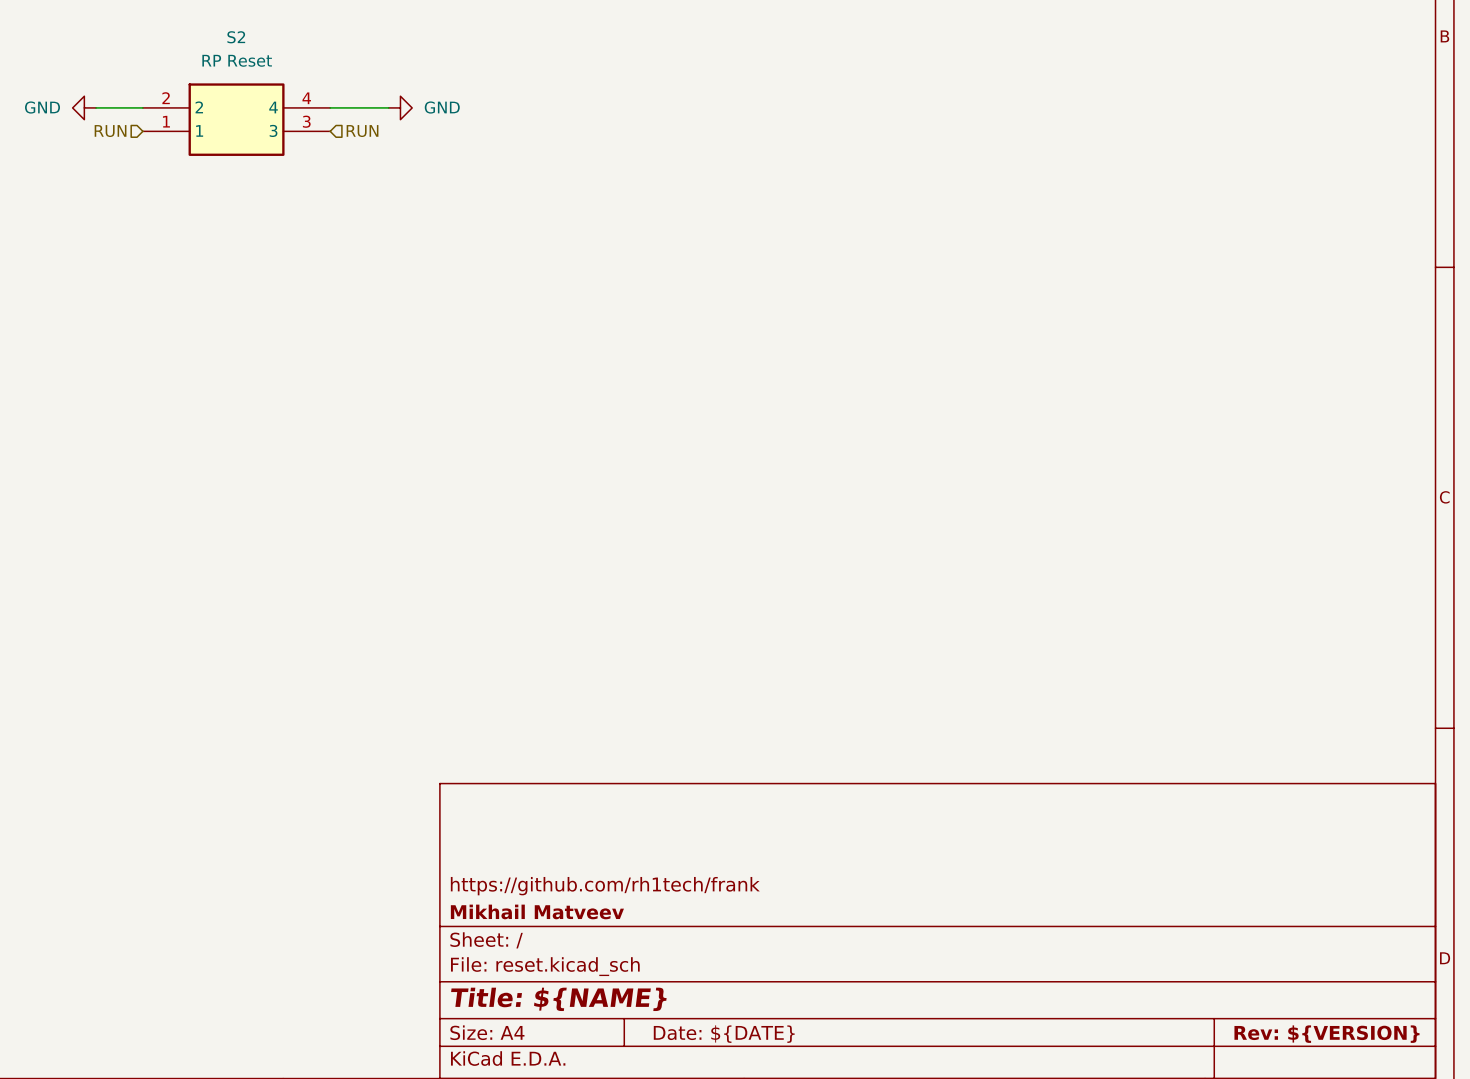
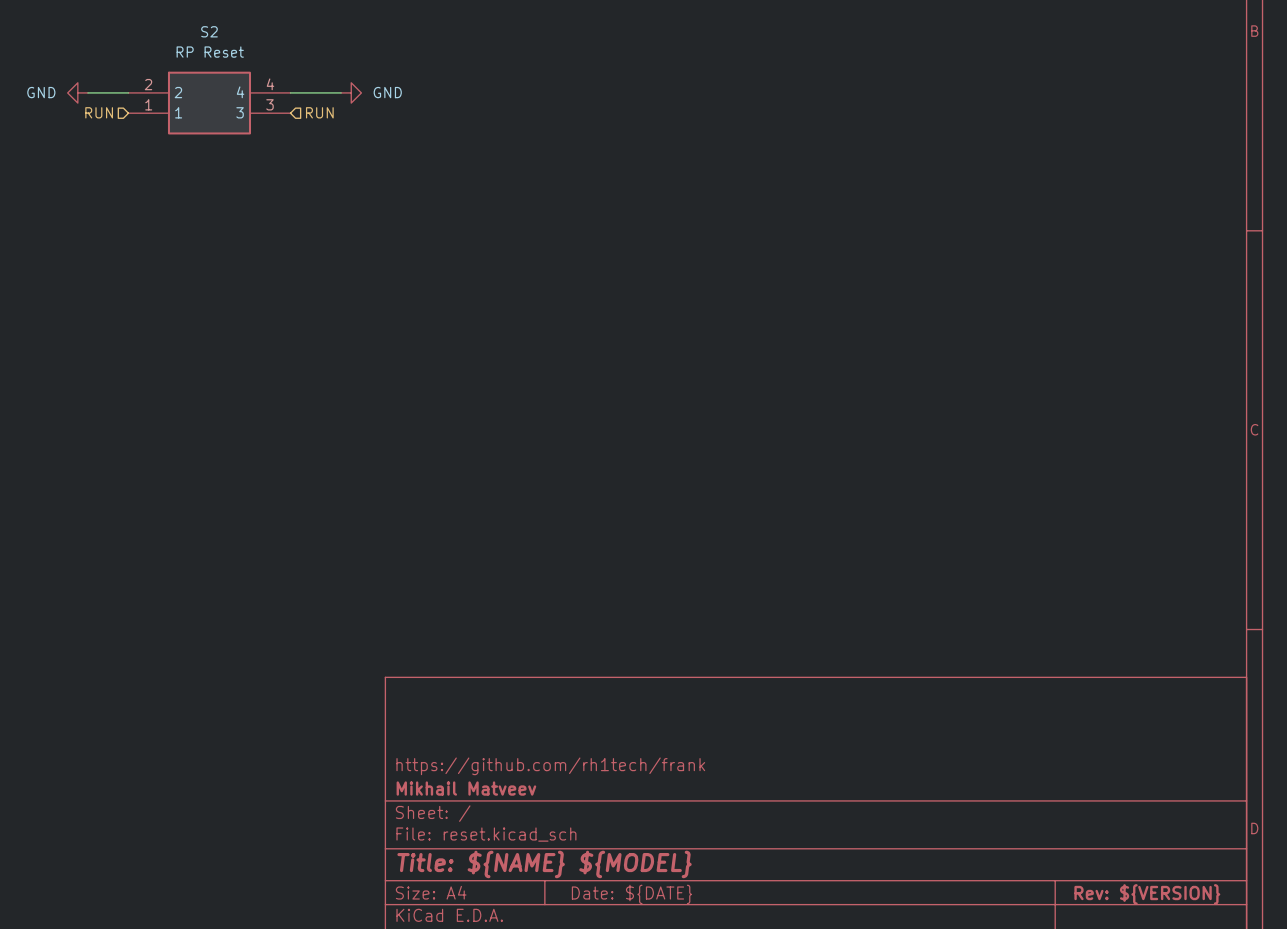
title block: Title: ${NAME} (558, 999) -> Title: ${NAME} ${MODEL} (544, 864)

